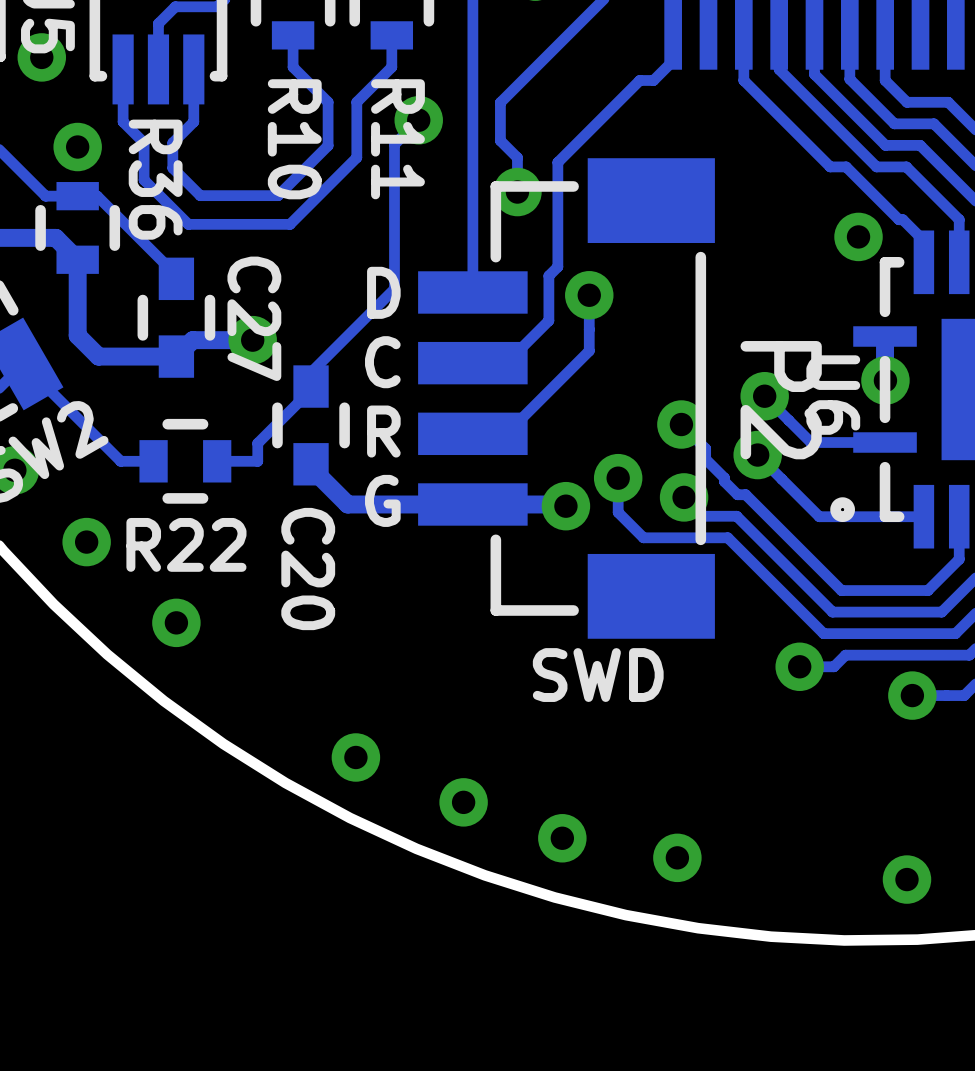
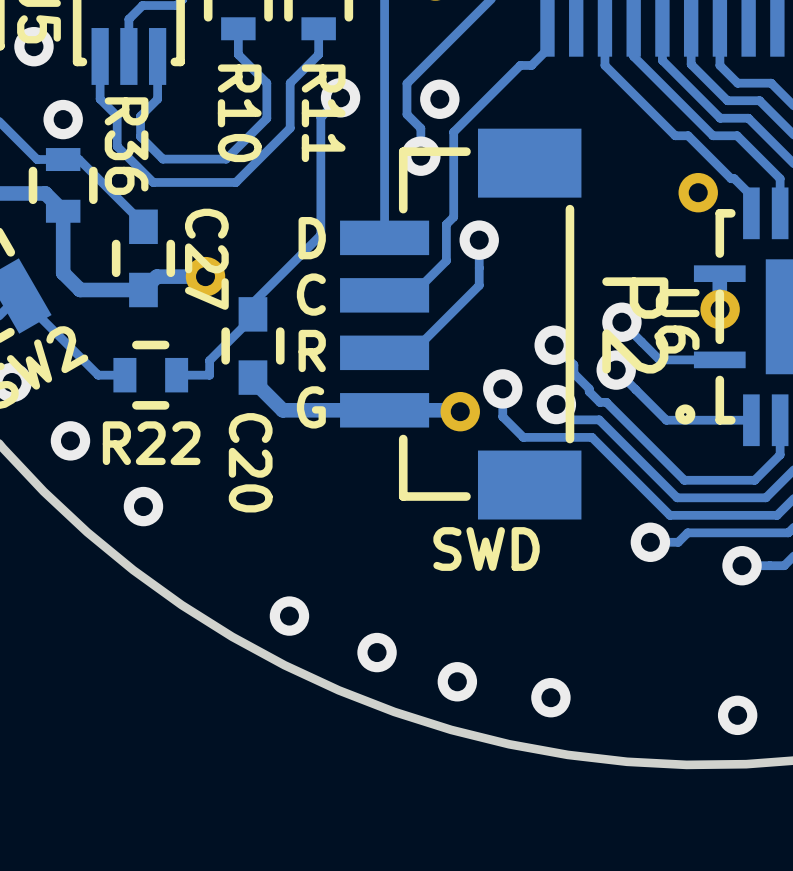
via: none -> (439, 99)

